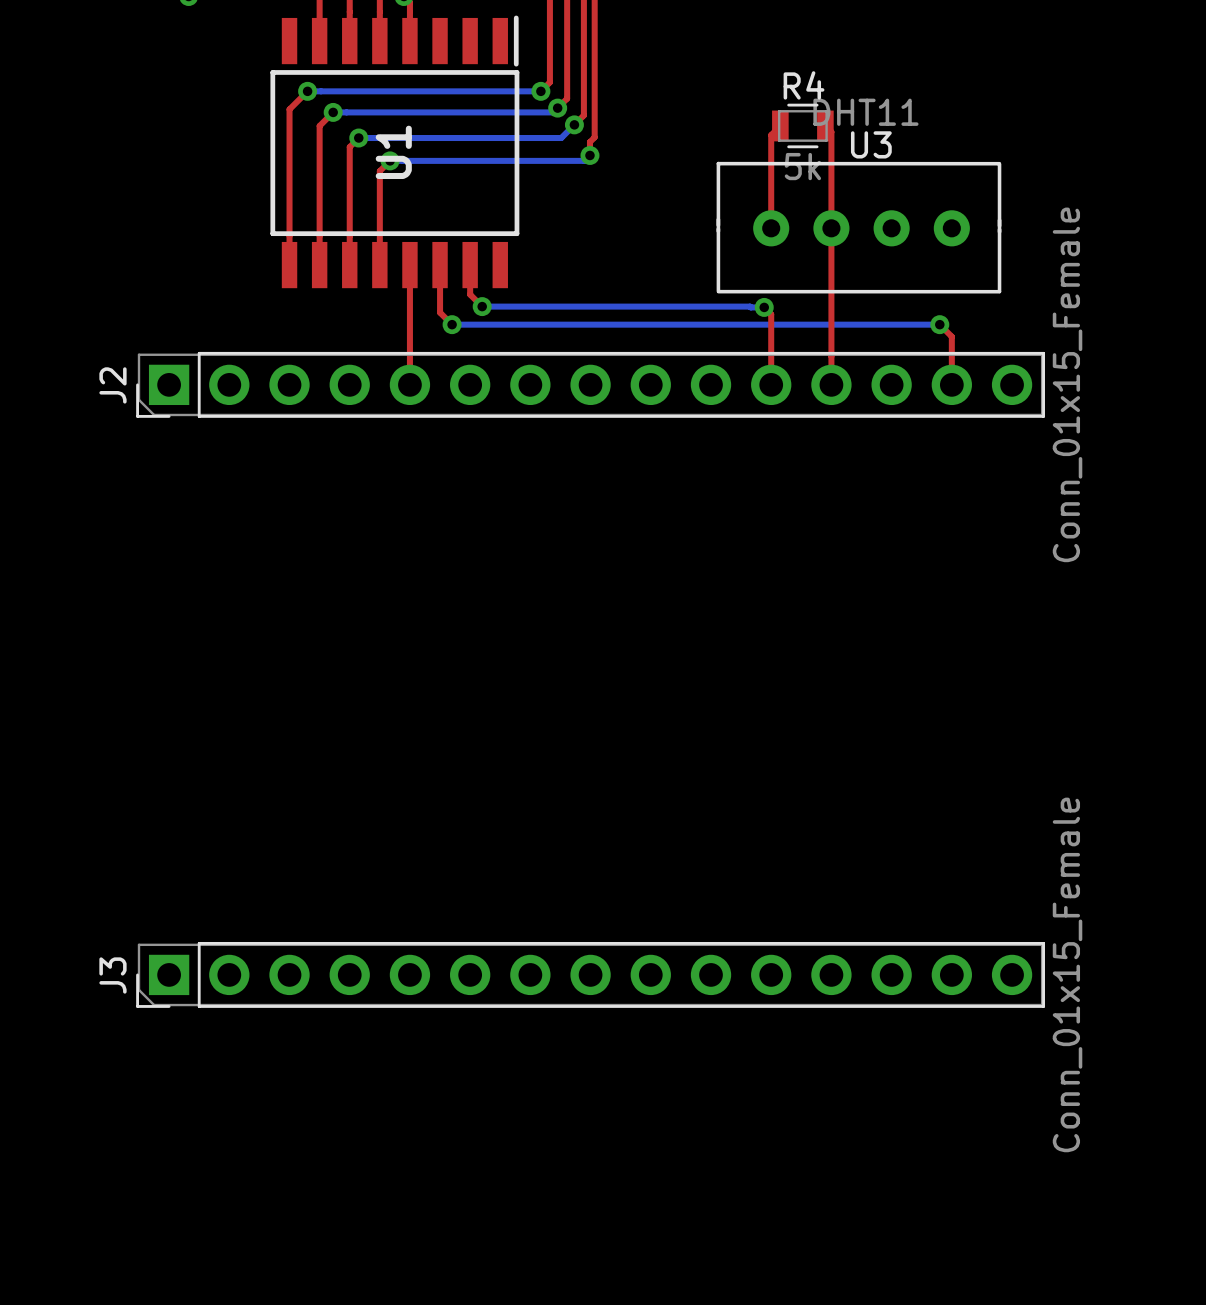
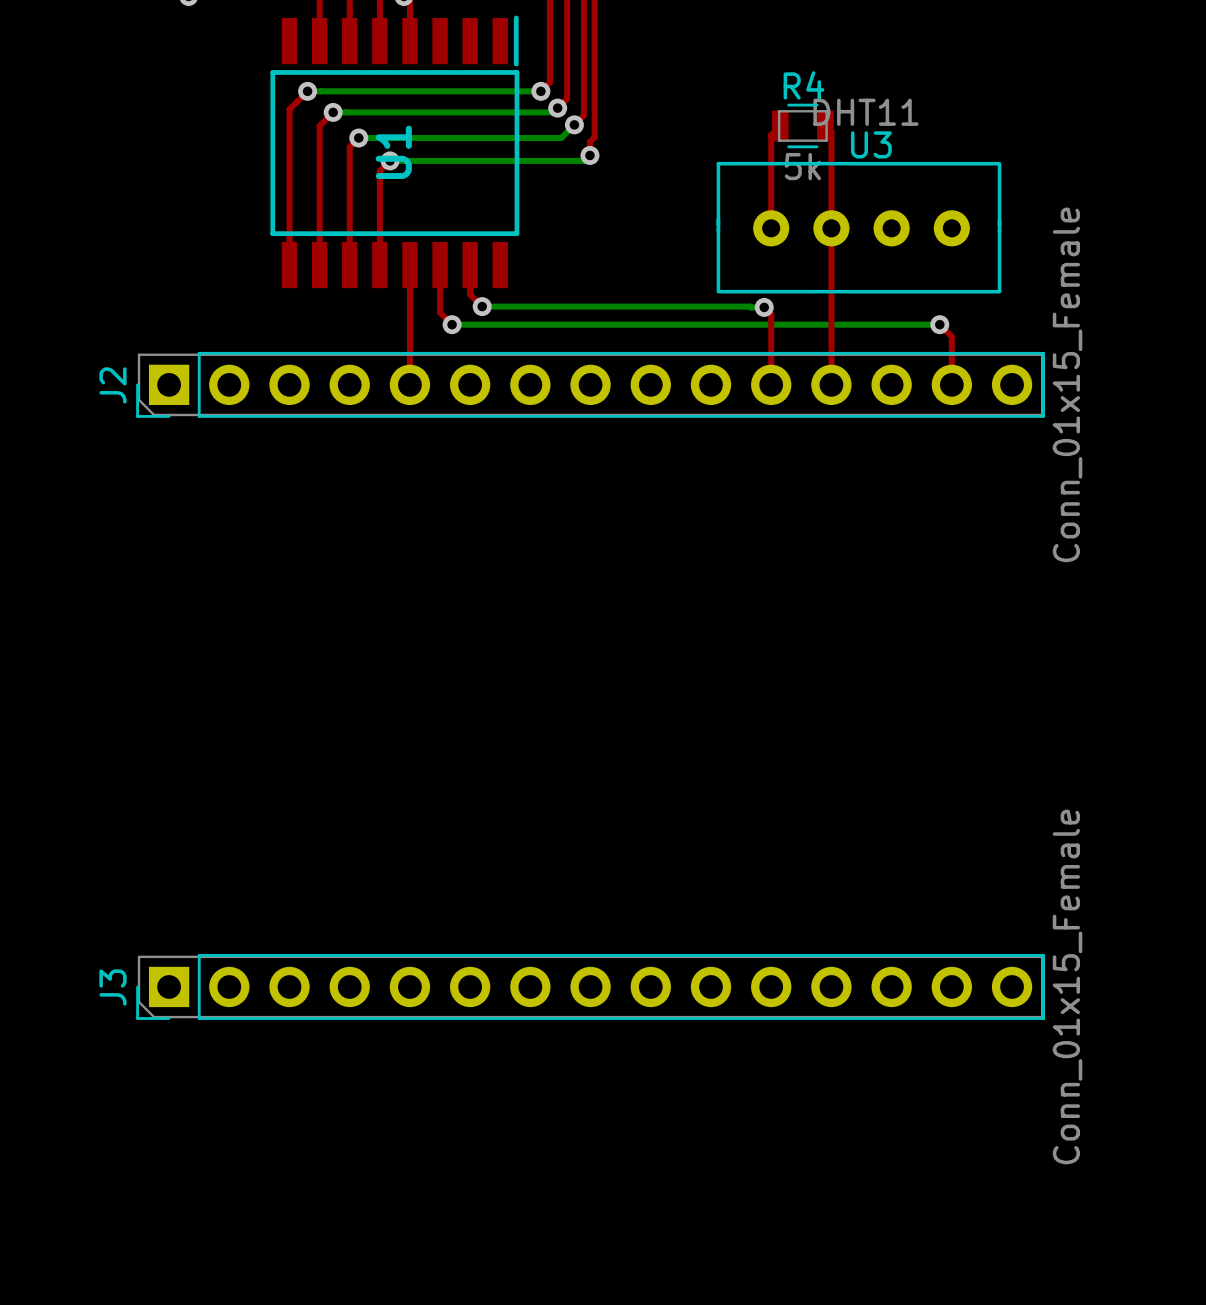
J3 position: (590, 974) -> (590, 986)

